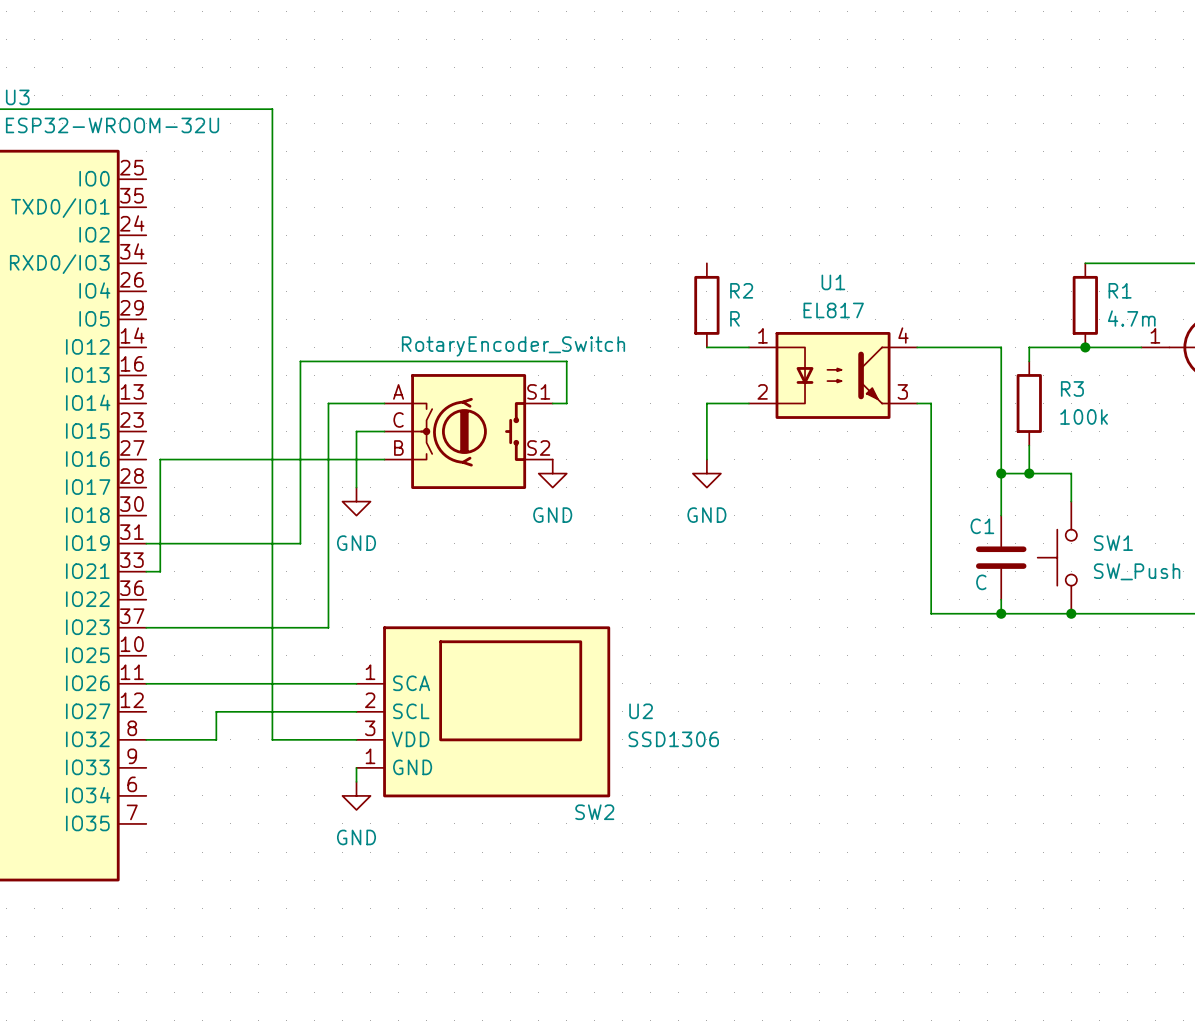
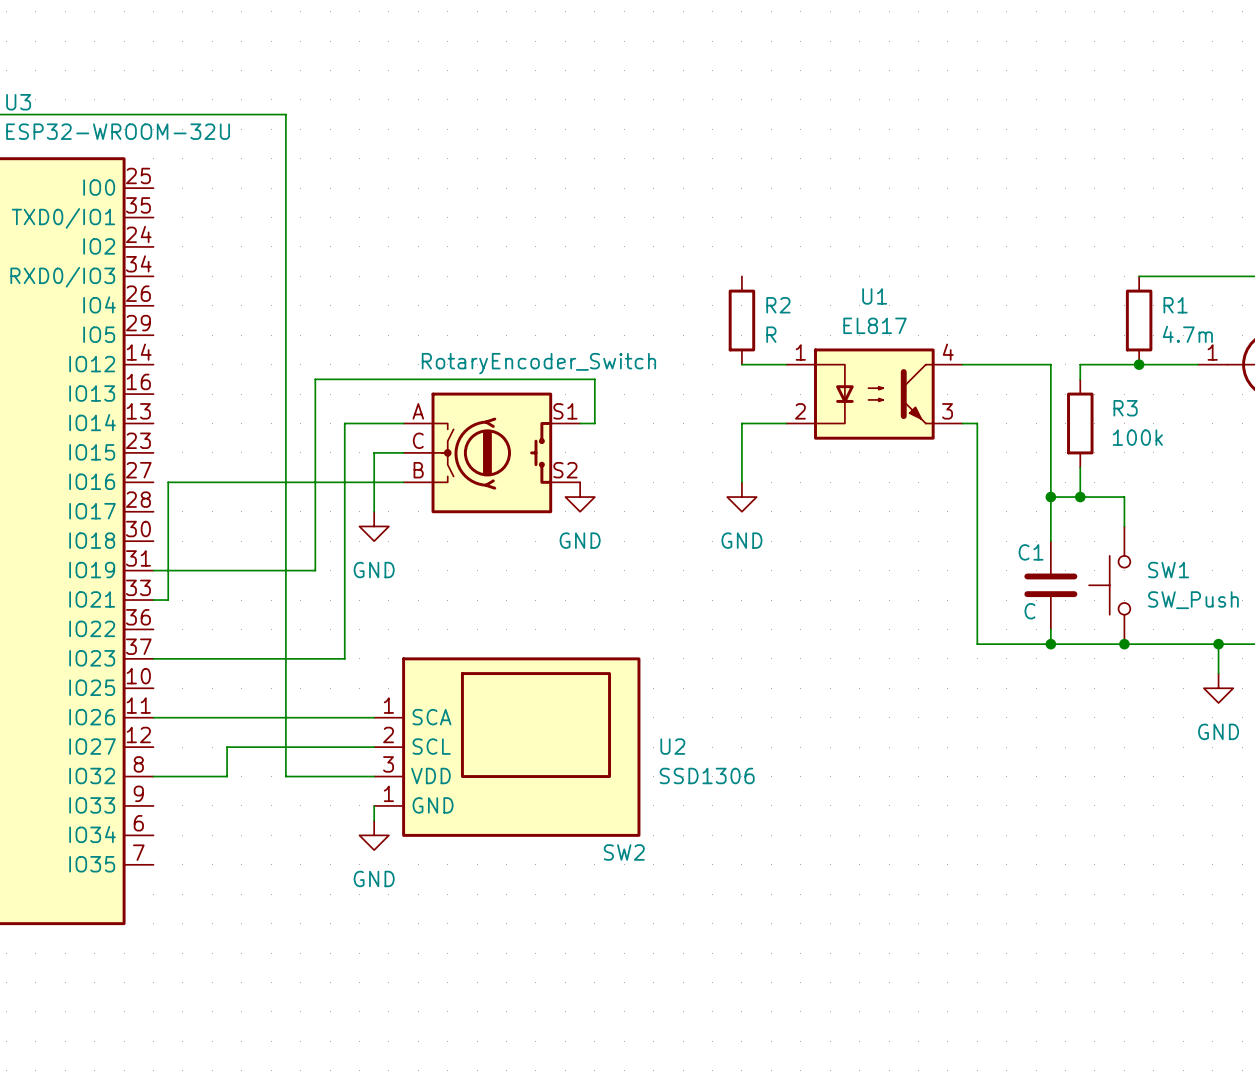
wire: none -> (1218, 644) (1218, 673)
junction: none -> (1218, 644)
power symbol: none -> GND (1218, 688)

